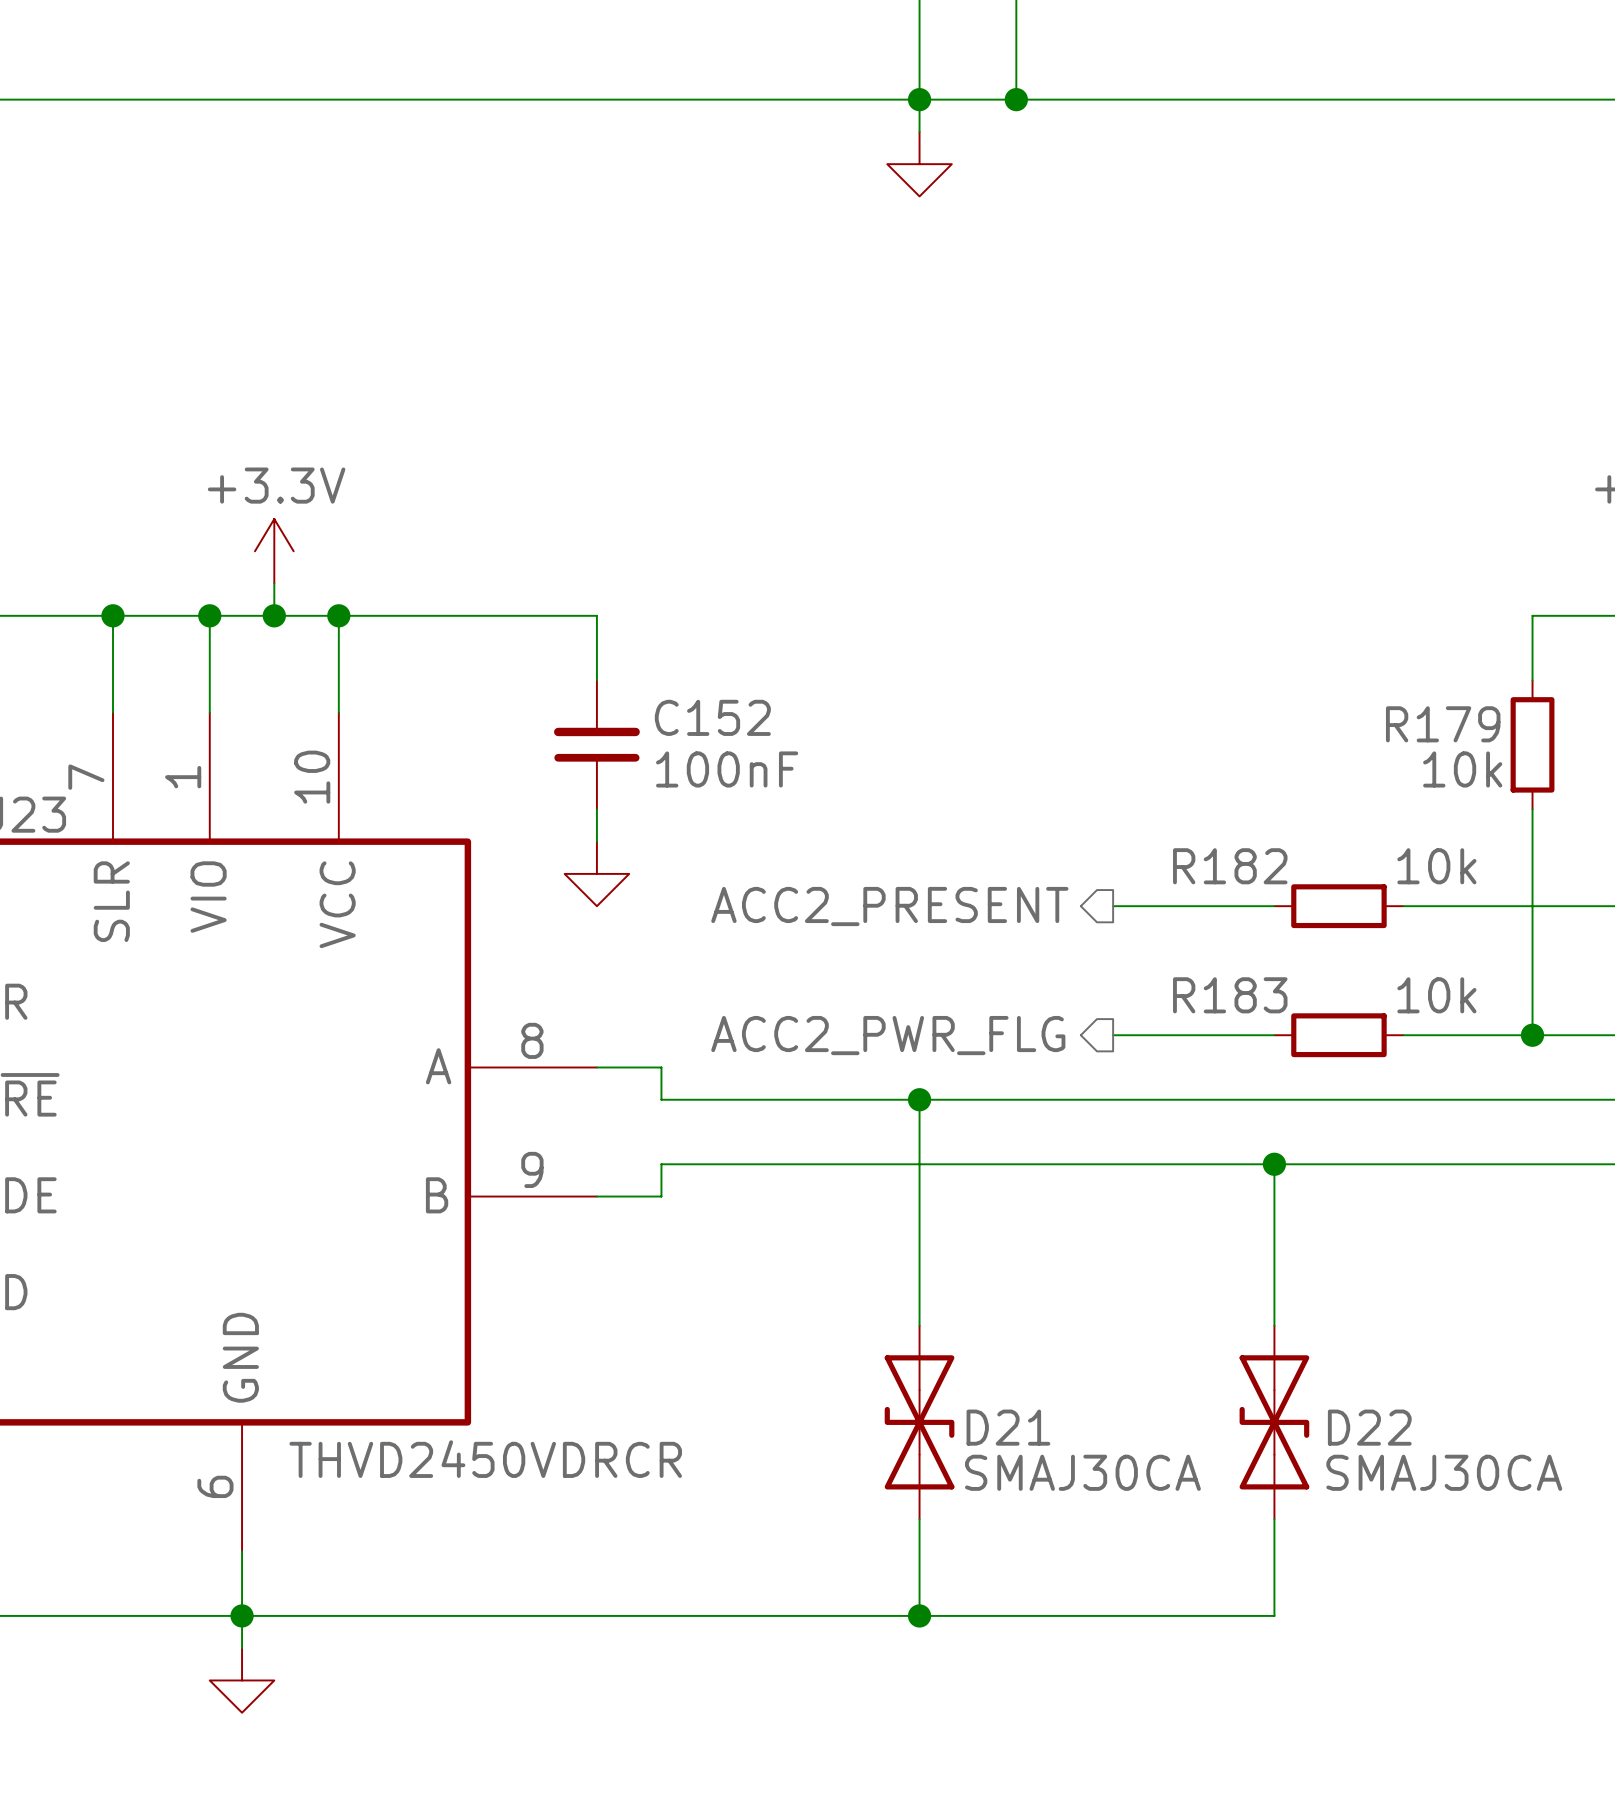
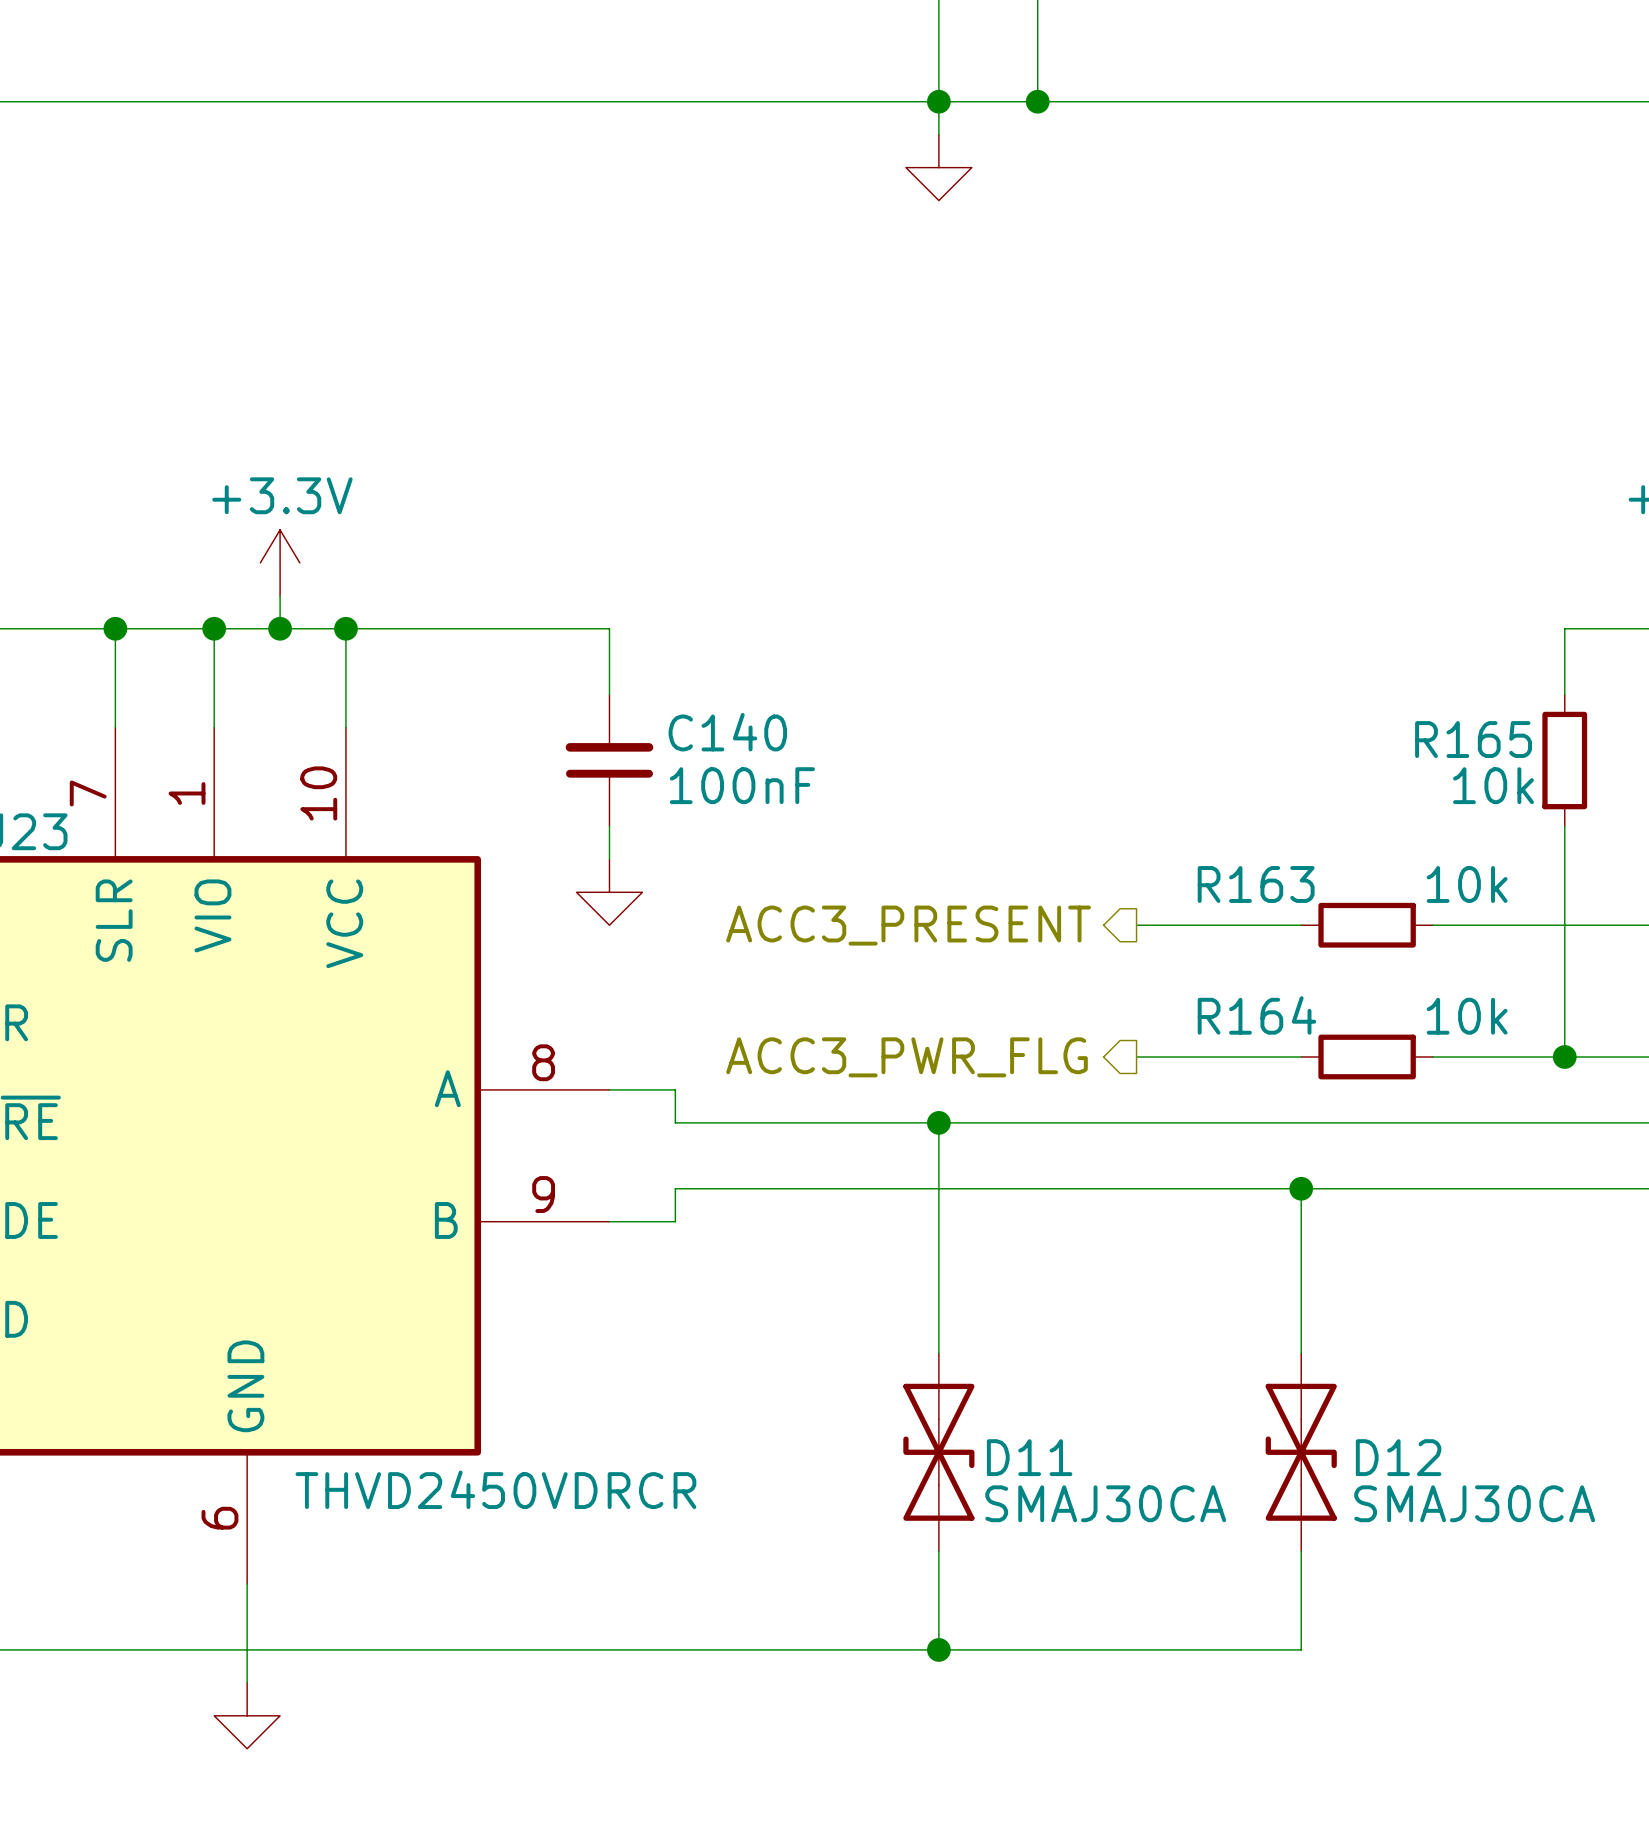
C152 name: C152 (712, 717) -> C140 (727, 732)
R179 name: R179 (1443, 724) -> R165 (1473, 739)
R182 name: R182 (1230, 866) -> R163 (1256, 884)
hierarchical label: ACC2_PRESENT (889, 906) -> ACC3_PRESENT (908, 925)
R183 name: R183 (1230, 995) -> R164 (1256, 1015)
hierarchical label: ACC2_PWR_FLG (888, 1035) -> ACC3_PWR_FLG (907, 1057)
D21 name: D21 (1008, 1427) -> D11 (1029, 1457)
D22 name: D22 (1369, 1427) -> D12 (1398, 1457)
junction: (242, 1615) -> none

